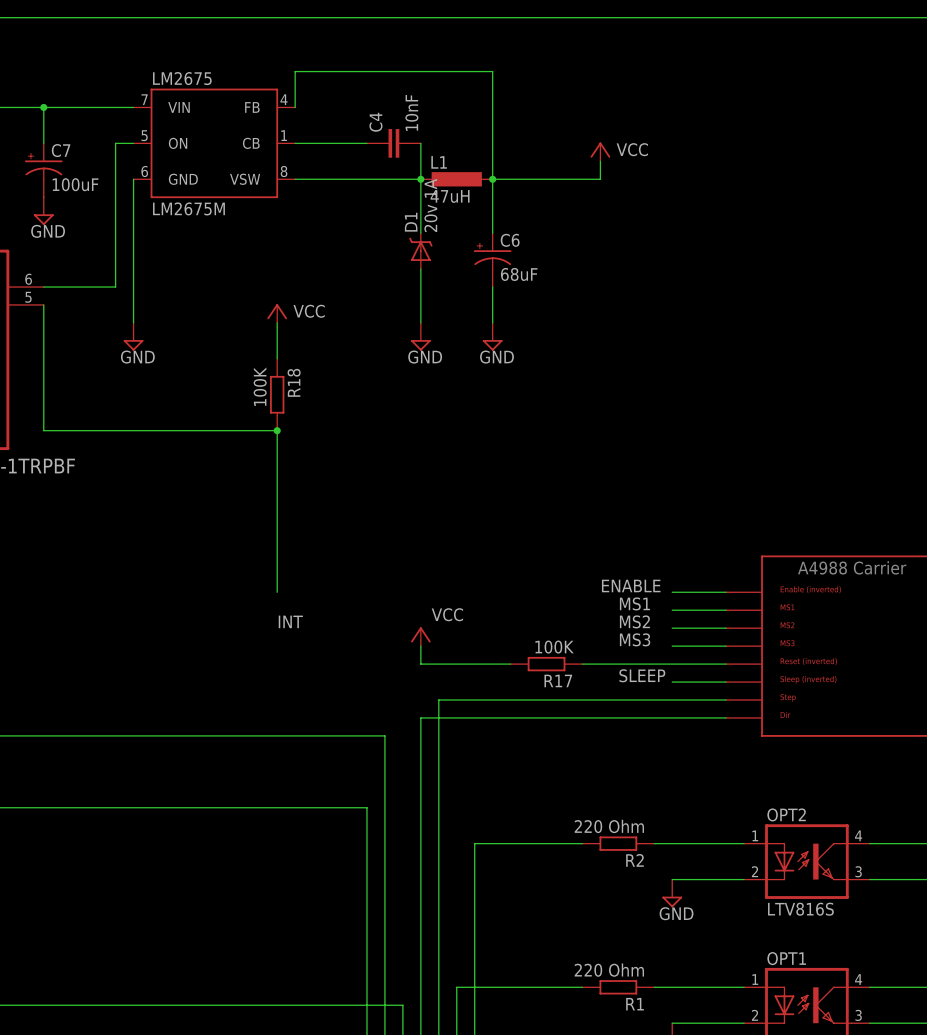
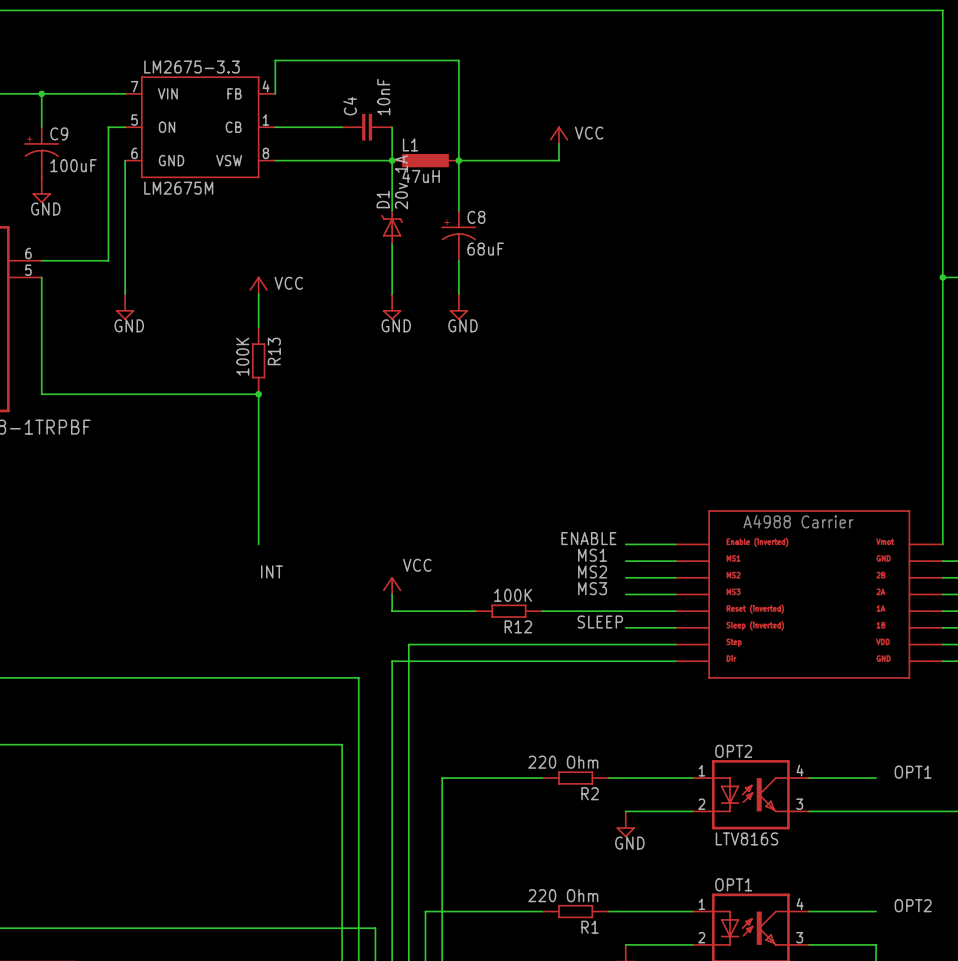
LM2675 name: LM2675 (182, 78) -> LM2675-3.3 (192, 67)
C7 name: C7 (61, 150) -> C9 (59, 133)
C6 name: C6 (510, 240) -> C8 (476, 217)
R18 name: R18 (294, 382) -> R13 (274, 351)
R17 name: R17 (558, 680) -> R12 (518, 626)

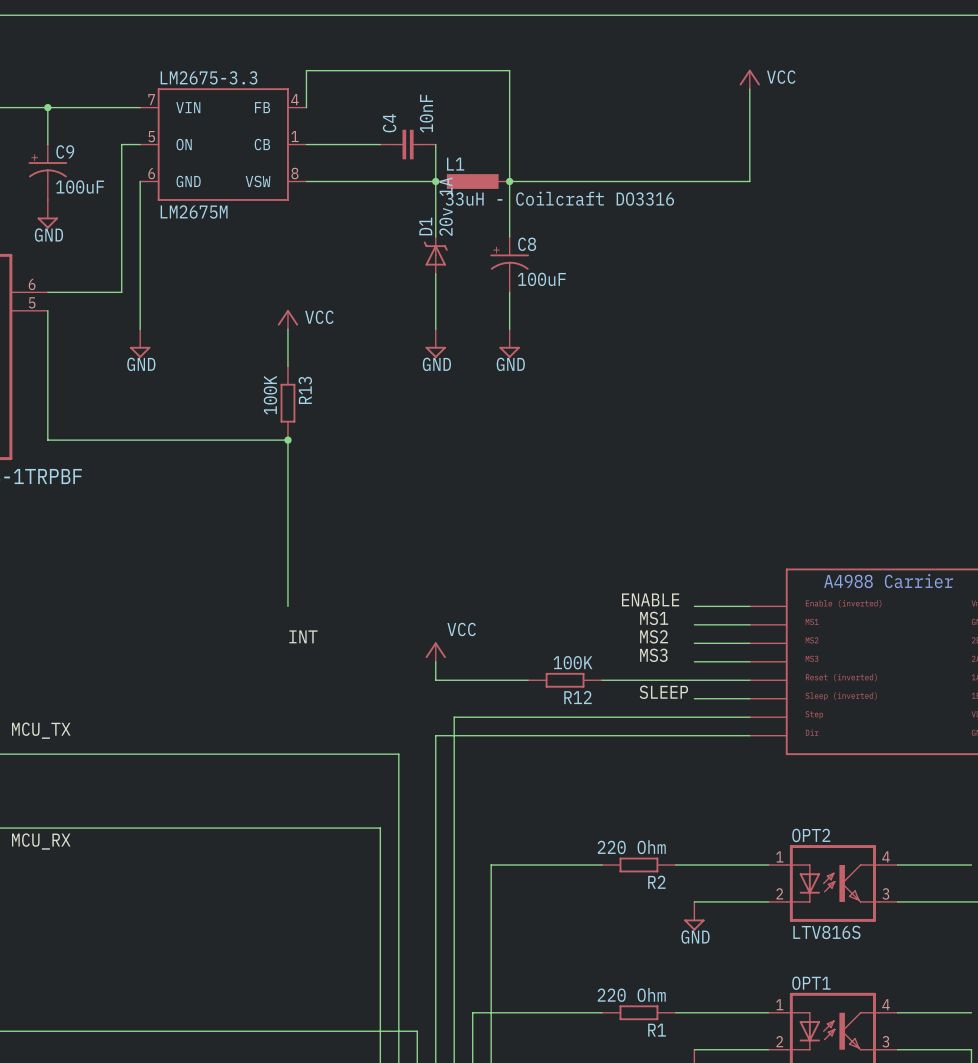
power symbol position: VCC (559, 135) -> VCC (749, 79)
wire: (559, 143) (559, 160) -> (749, 89) (749, 181) (620, 181)
L1 value: 47uH (421, 176) -> 33uH - Coilcraft DO3316 (559, 198)
C8 value: 68uF (485, 249) -> 100uF (541, 279)
label: none -> MCU_TX (41, 730)
label: none -> MCU_RX (41, 841)

